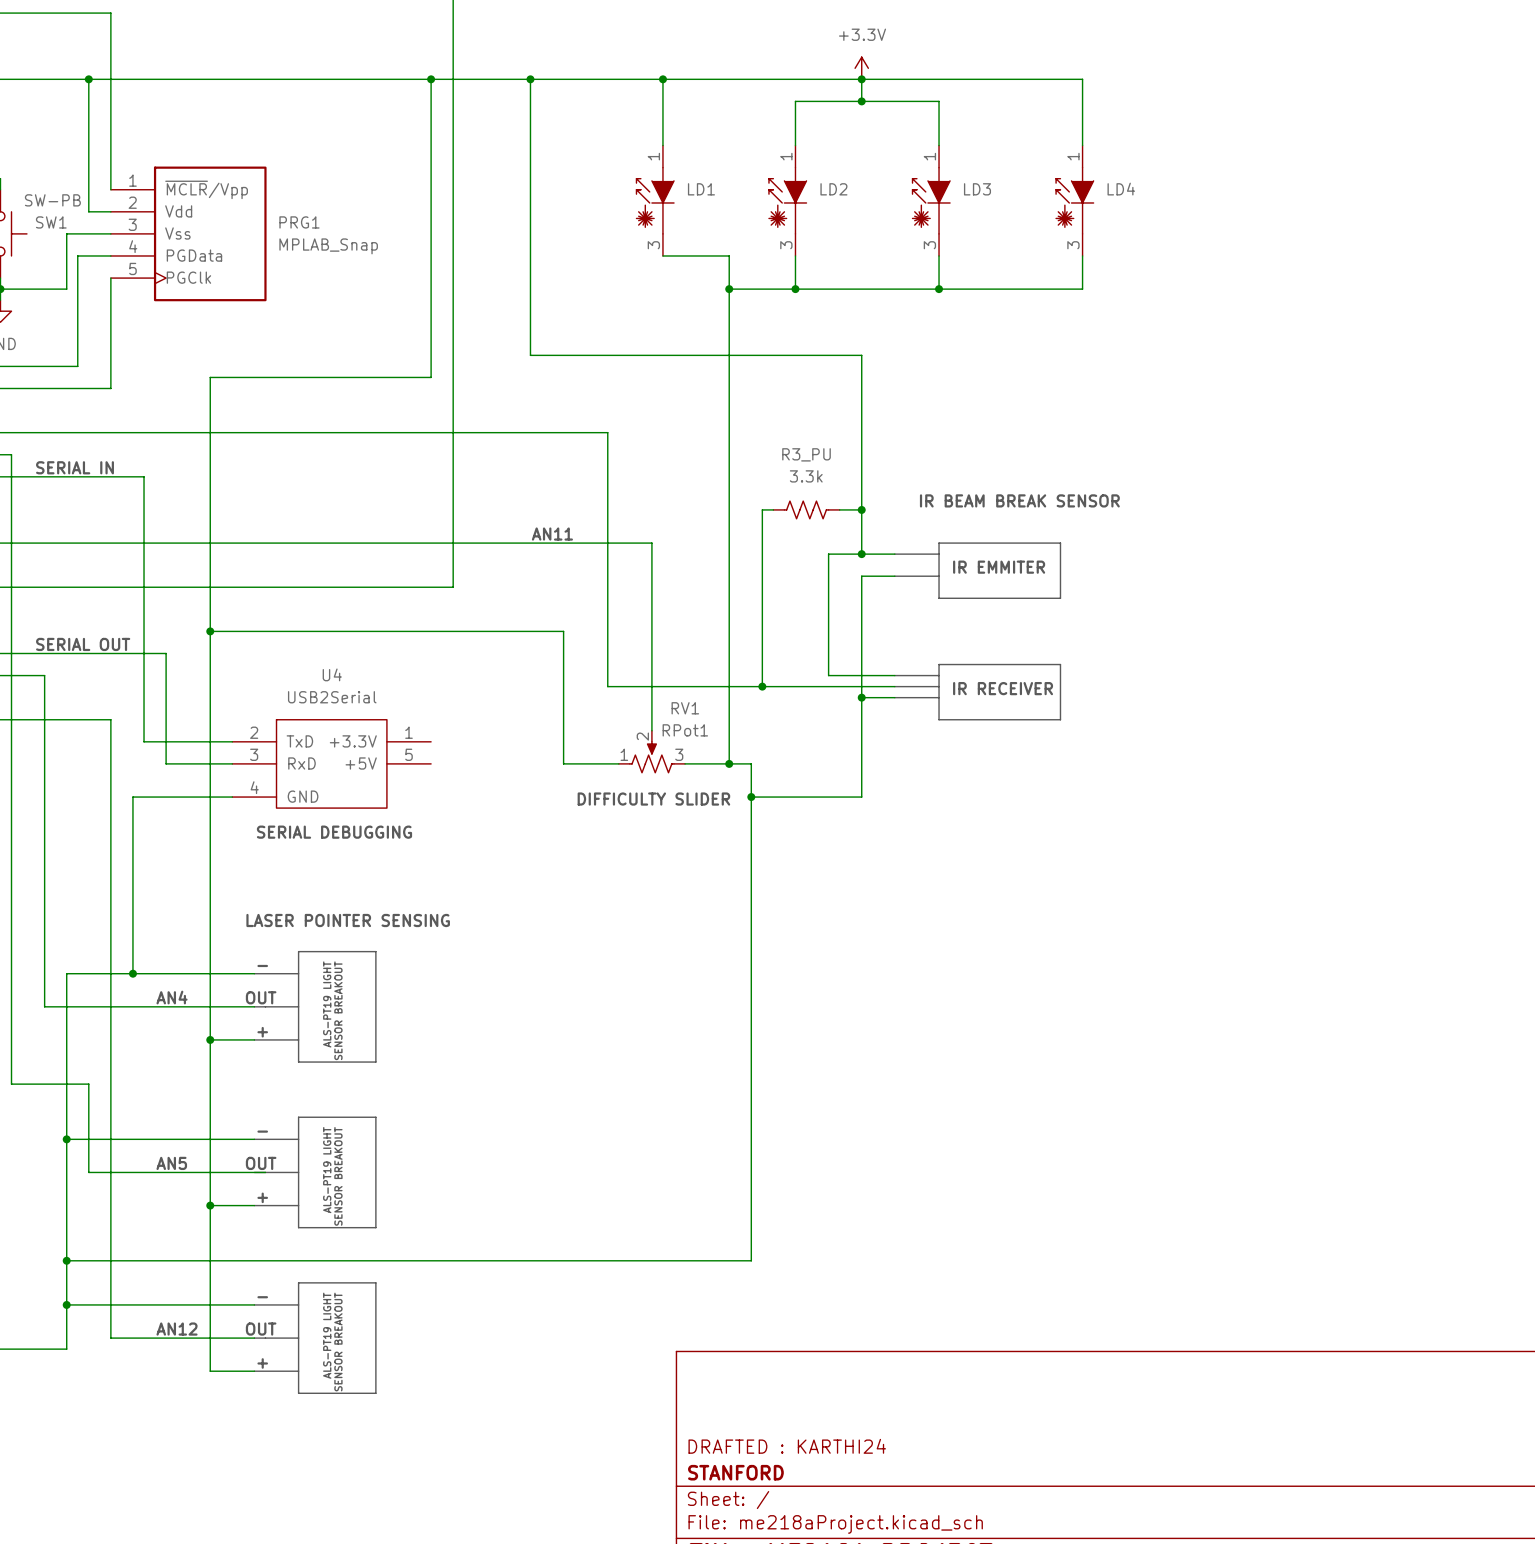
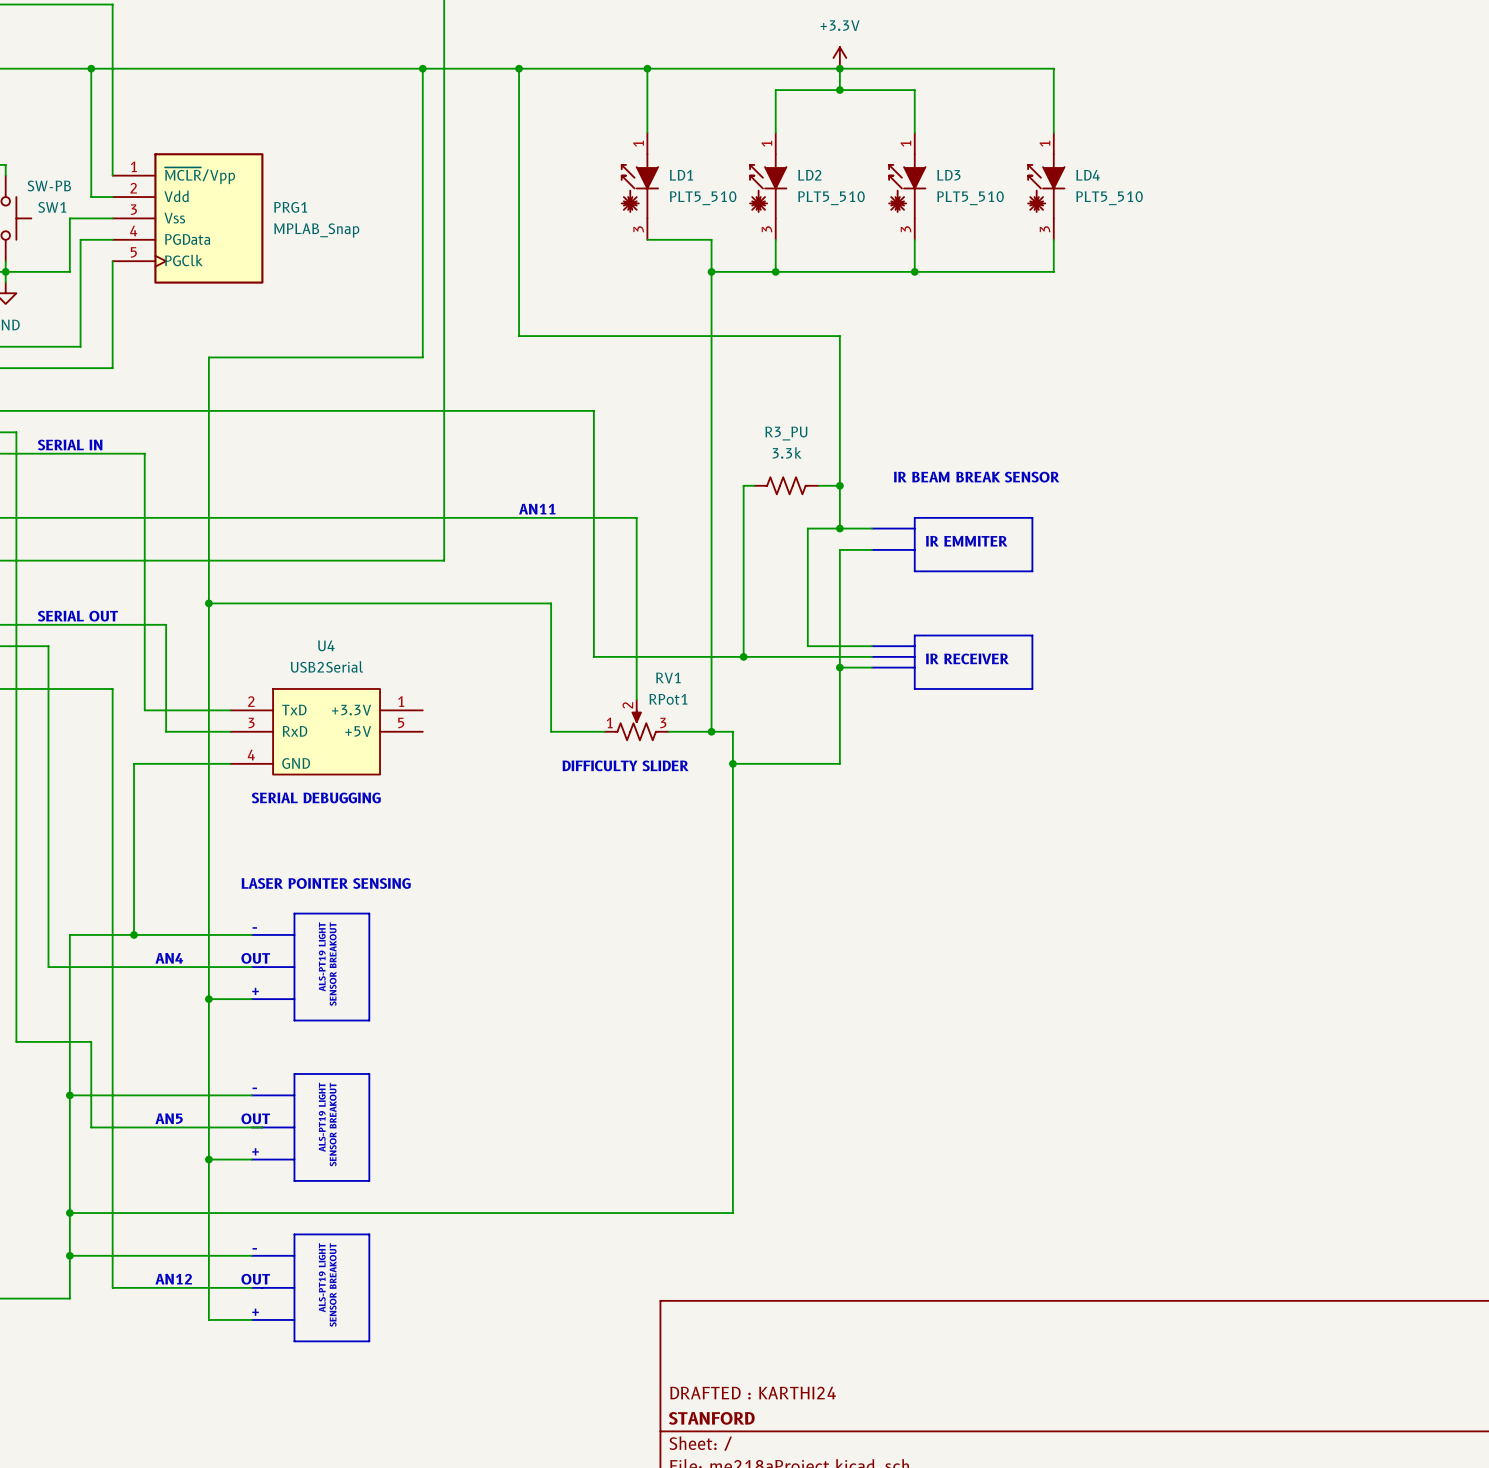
LD1 value: none -> PLT5_510 (703, 198)
LD2 value: none -> PLT5_510 (831, 198)
LD3 value: none -> PLT5_510 (970, 198)
LD4 value: none -> PLT5_510 (1109, 198)

